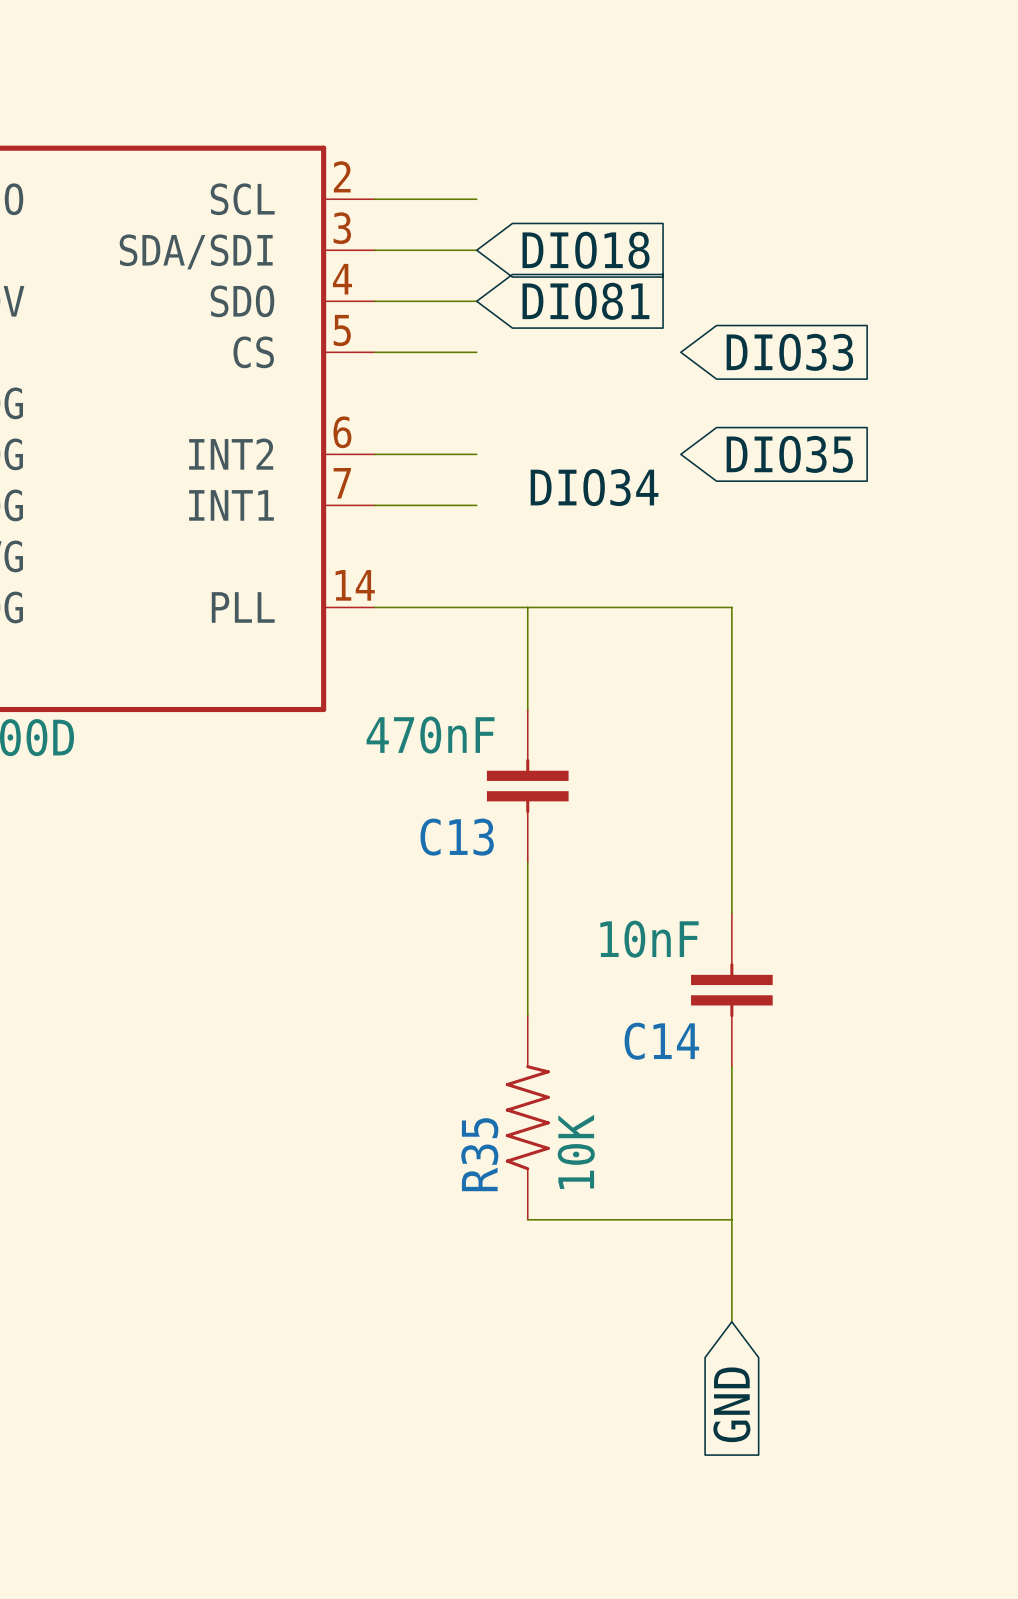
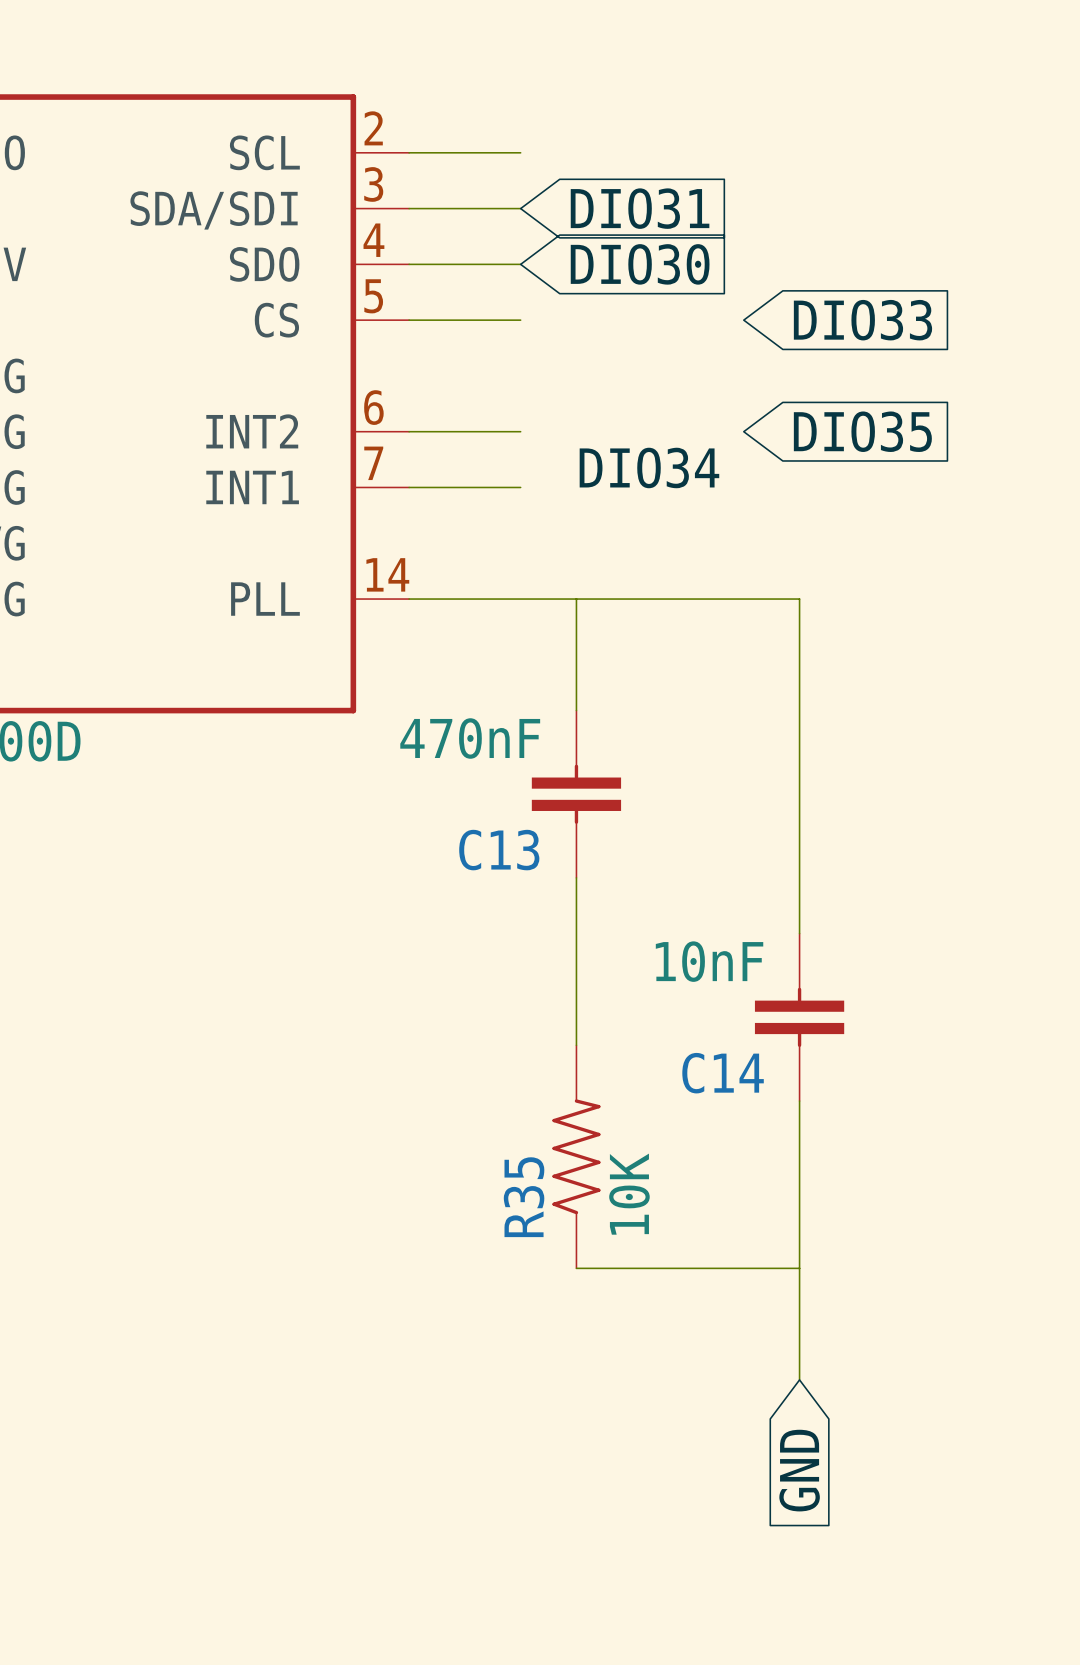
global label: DIO18 (586, 250) -> DIO31 (640, 208)
global label: DIO81 (585, 301) -> DIO30 (640, 264)

